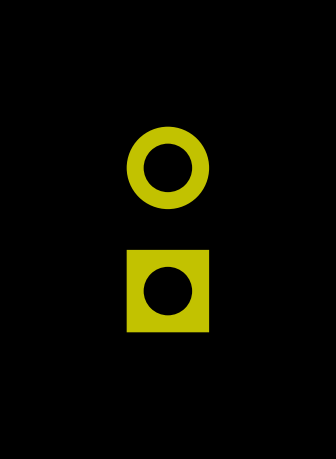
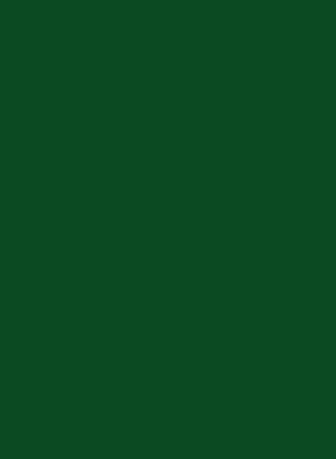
part: (167, 229) -> none

